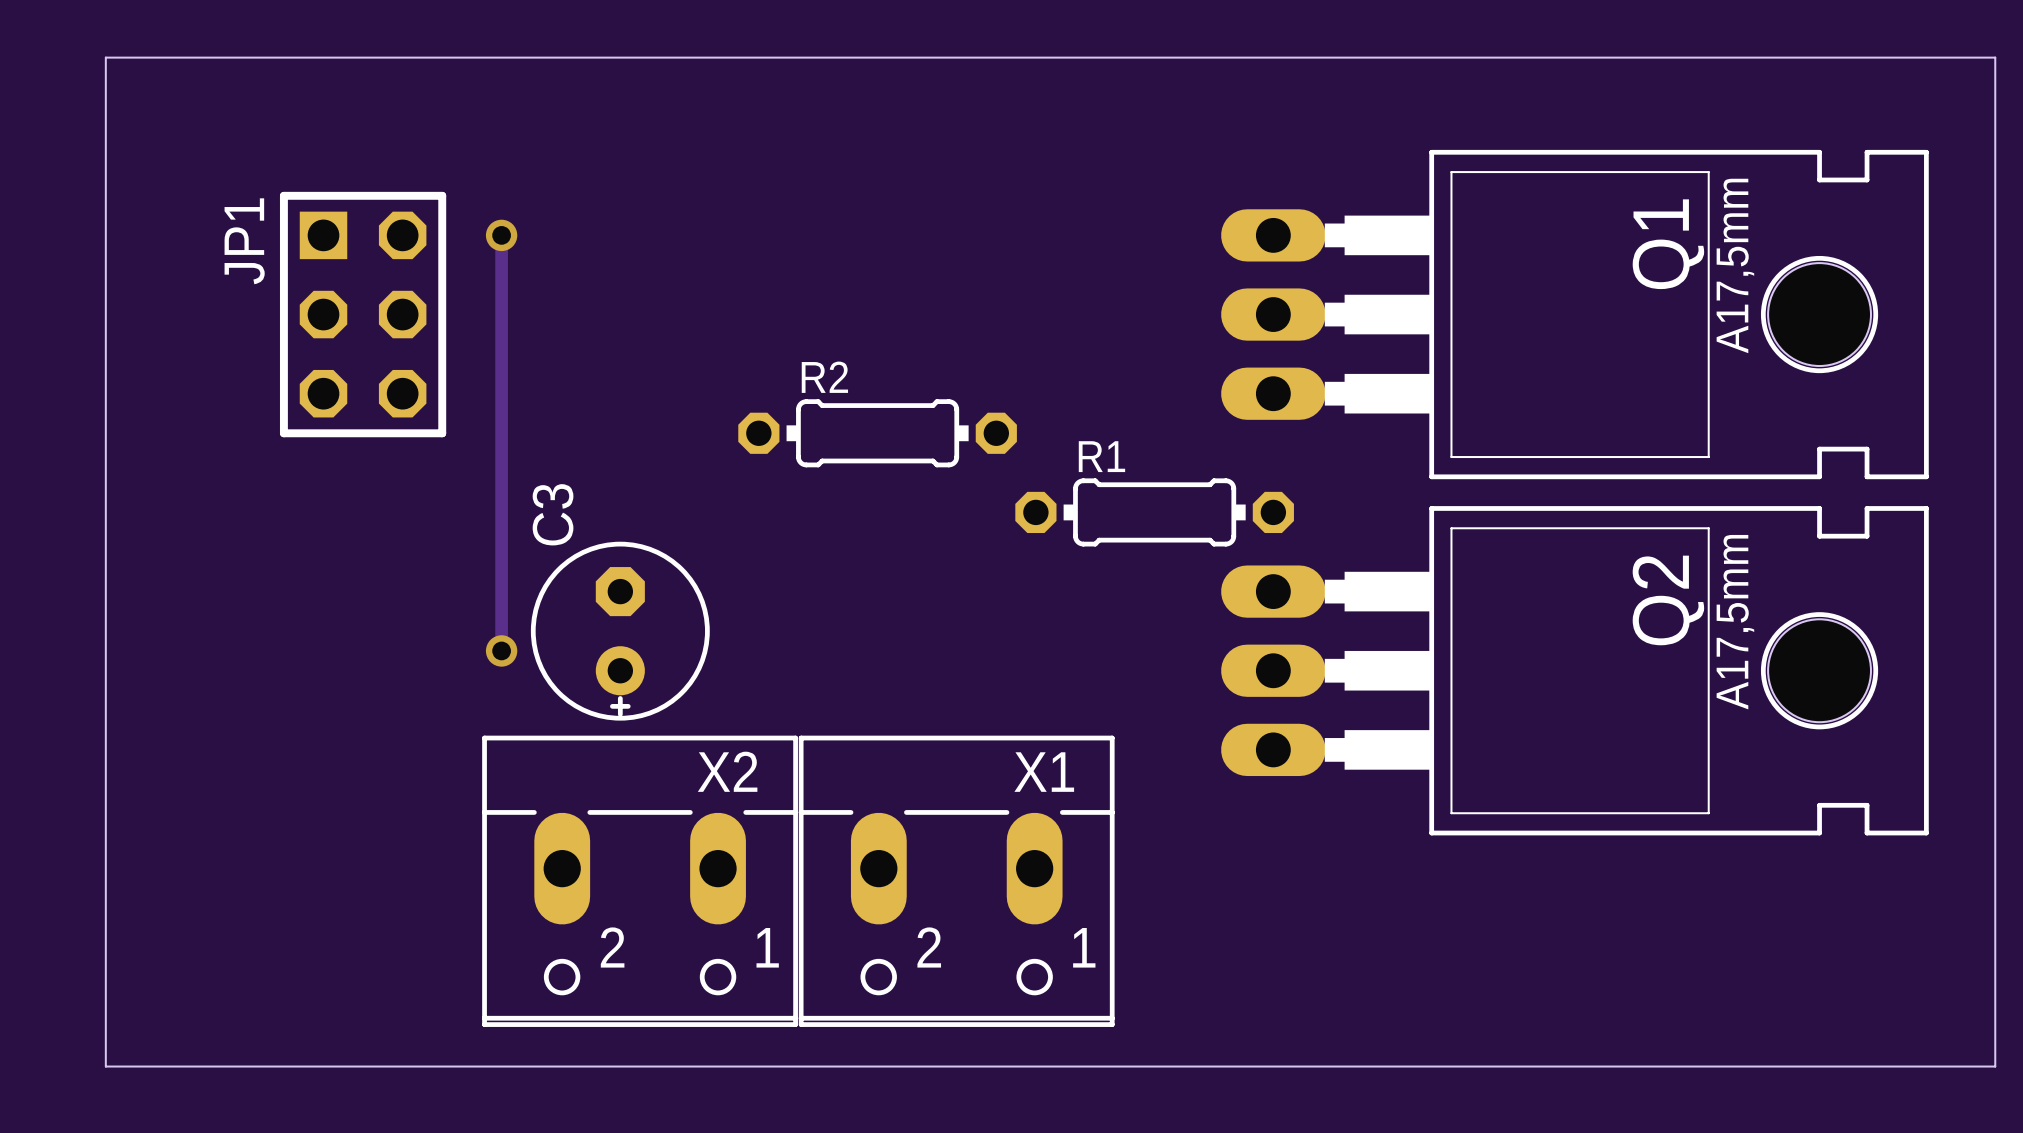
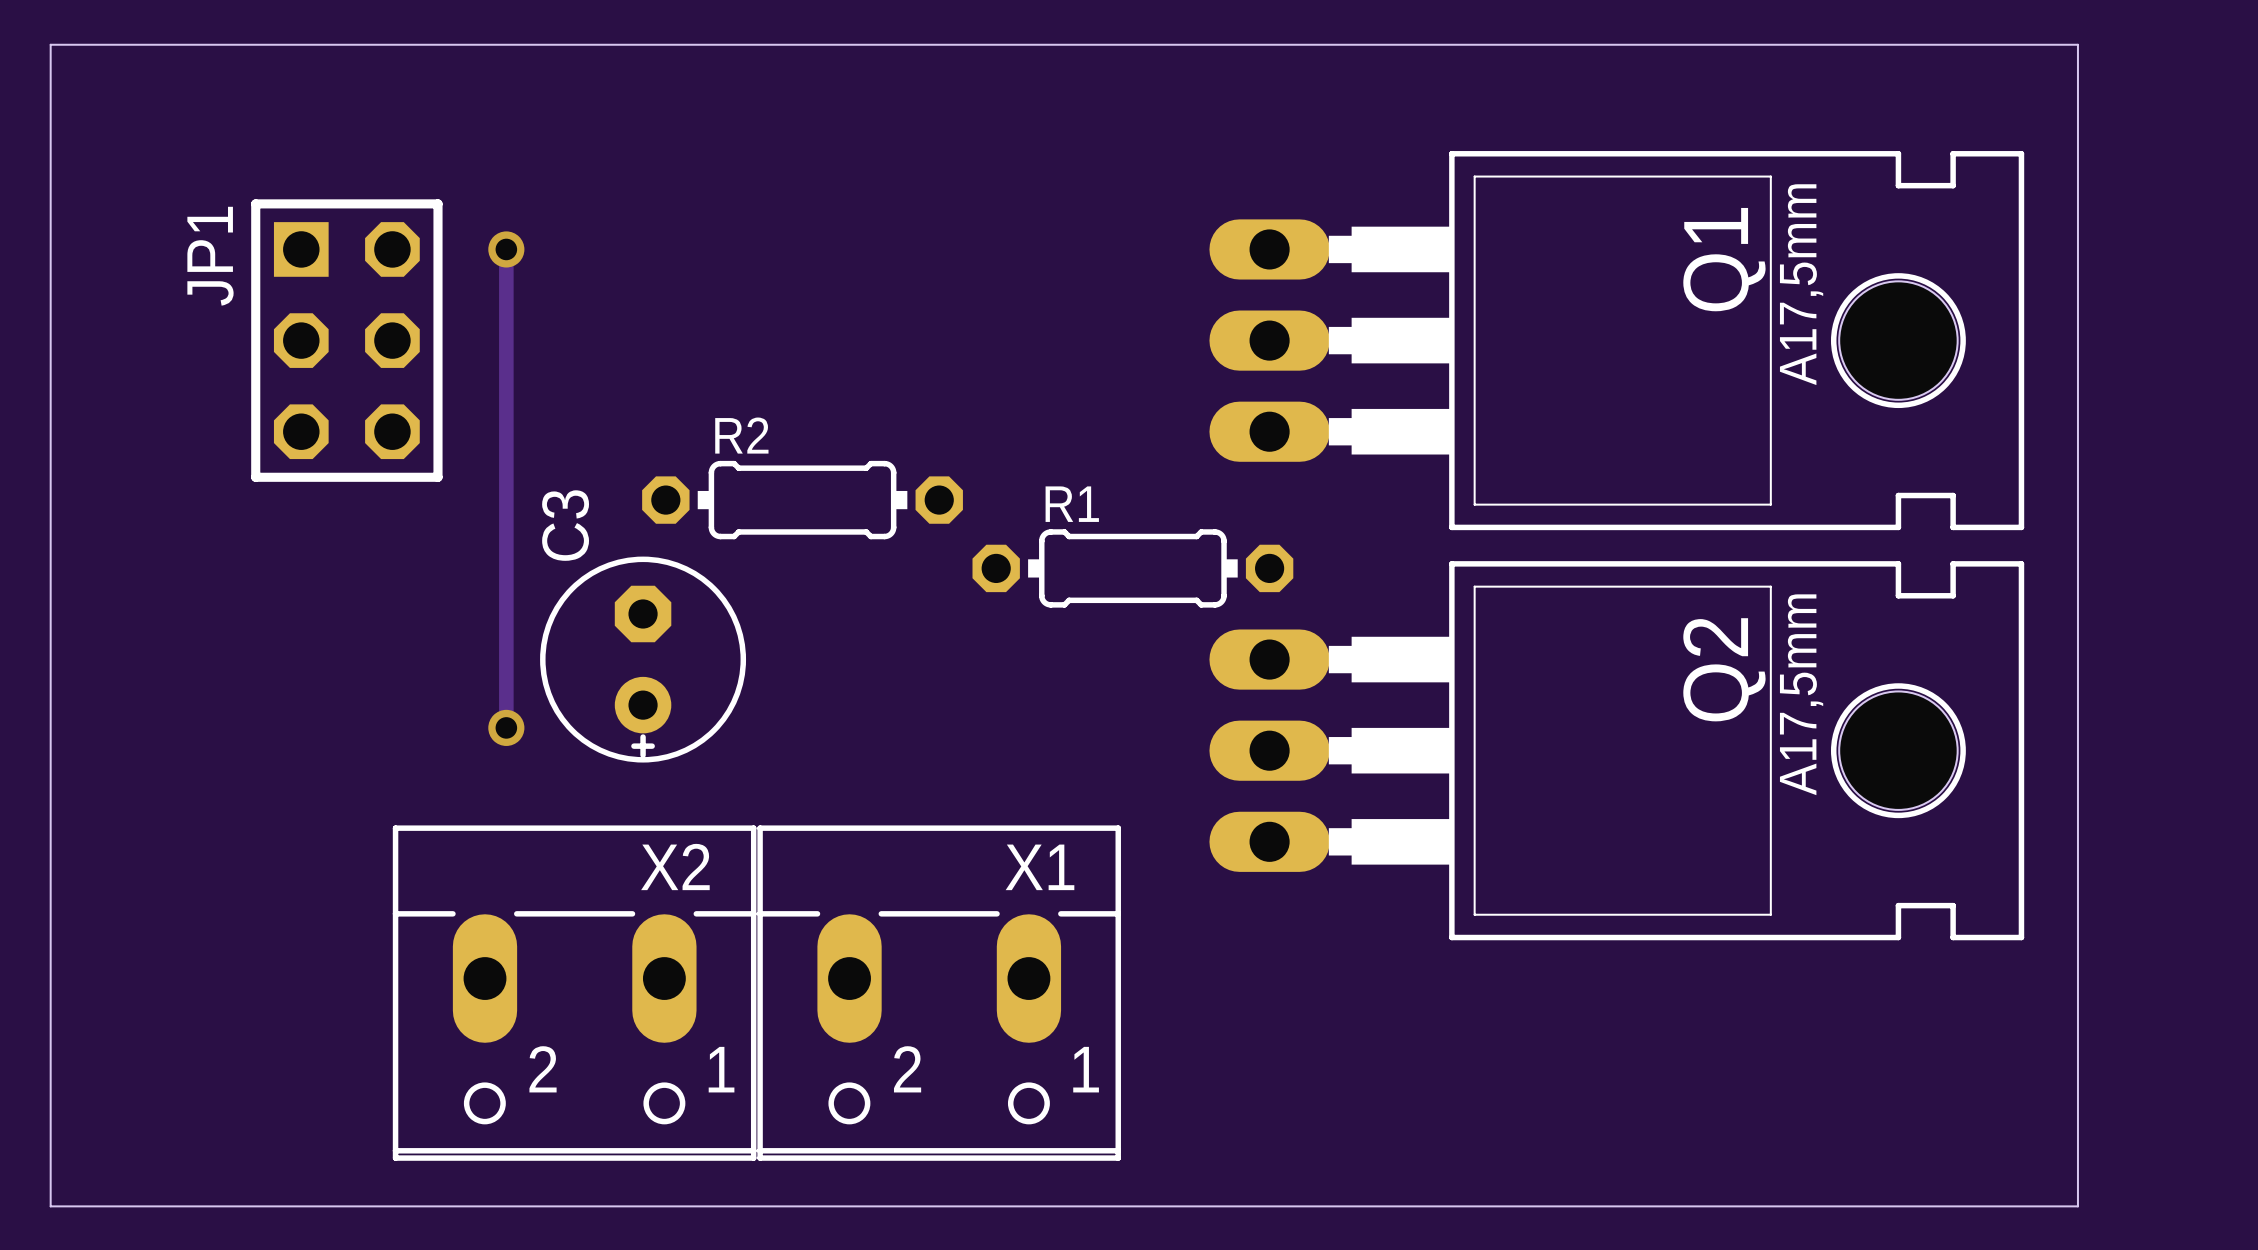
board edge: (1866, 57) (1995, 57) (1995, 1066) (1866, 1066) -> (2077, 44) (2077, 1206)
Q1 position: (1574, 314) -> (1616, 340)
R2 position: (877, 433) -> (802, 500)
R1 position: (1154, 512) -> (1132, 568)
C3 position: (620, 631) -> (643, 659)
Q2 position: (1574, 670) -> (1616, 750)
X2 position: (640, 881) -> (574, 993)
X1 position: (956, 881) -> (939, 993)

